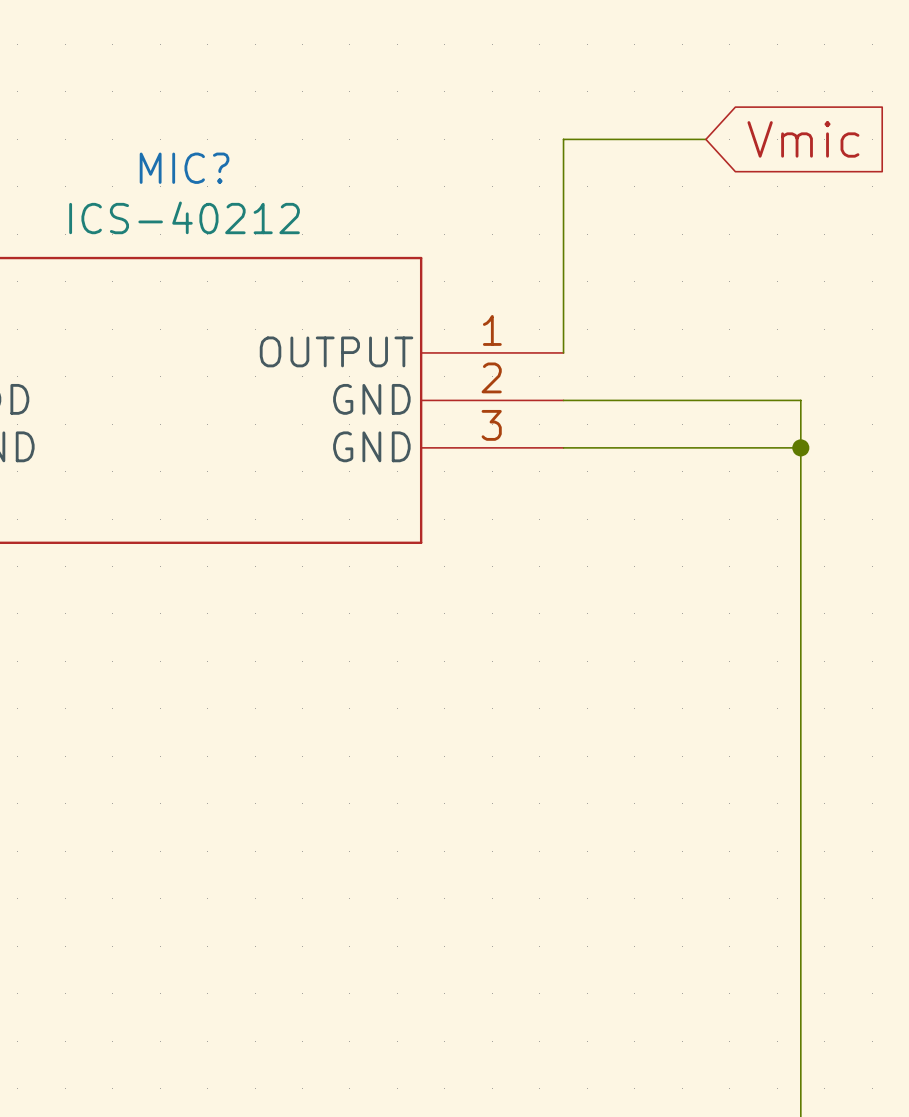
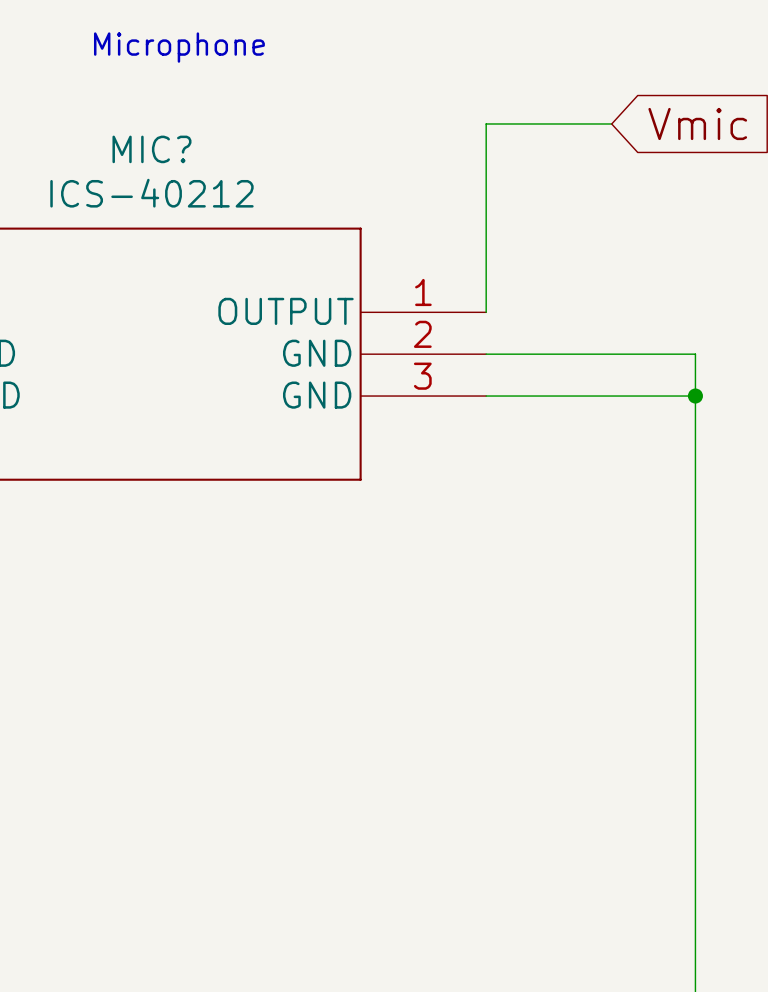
text: none -> Microphone (179, 47)

